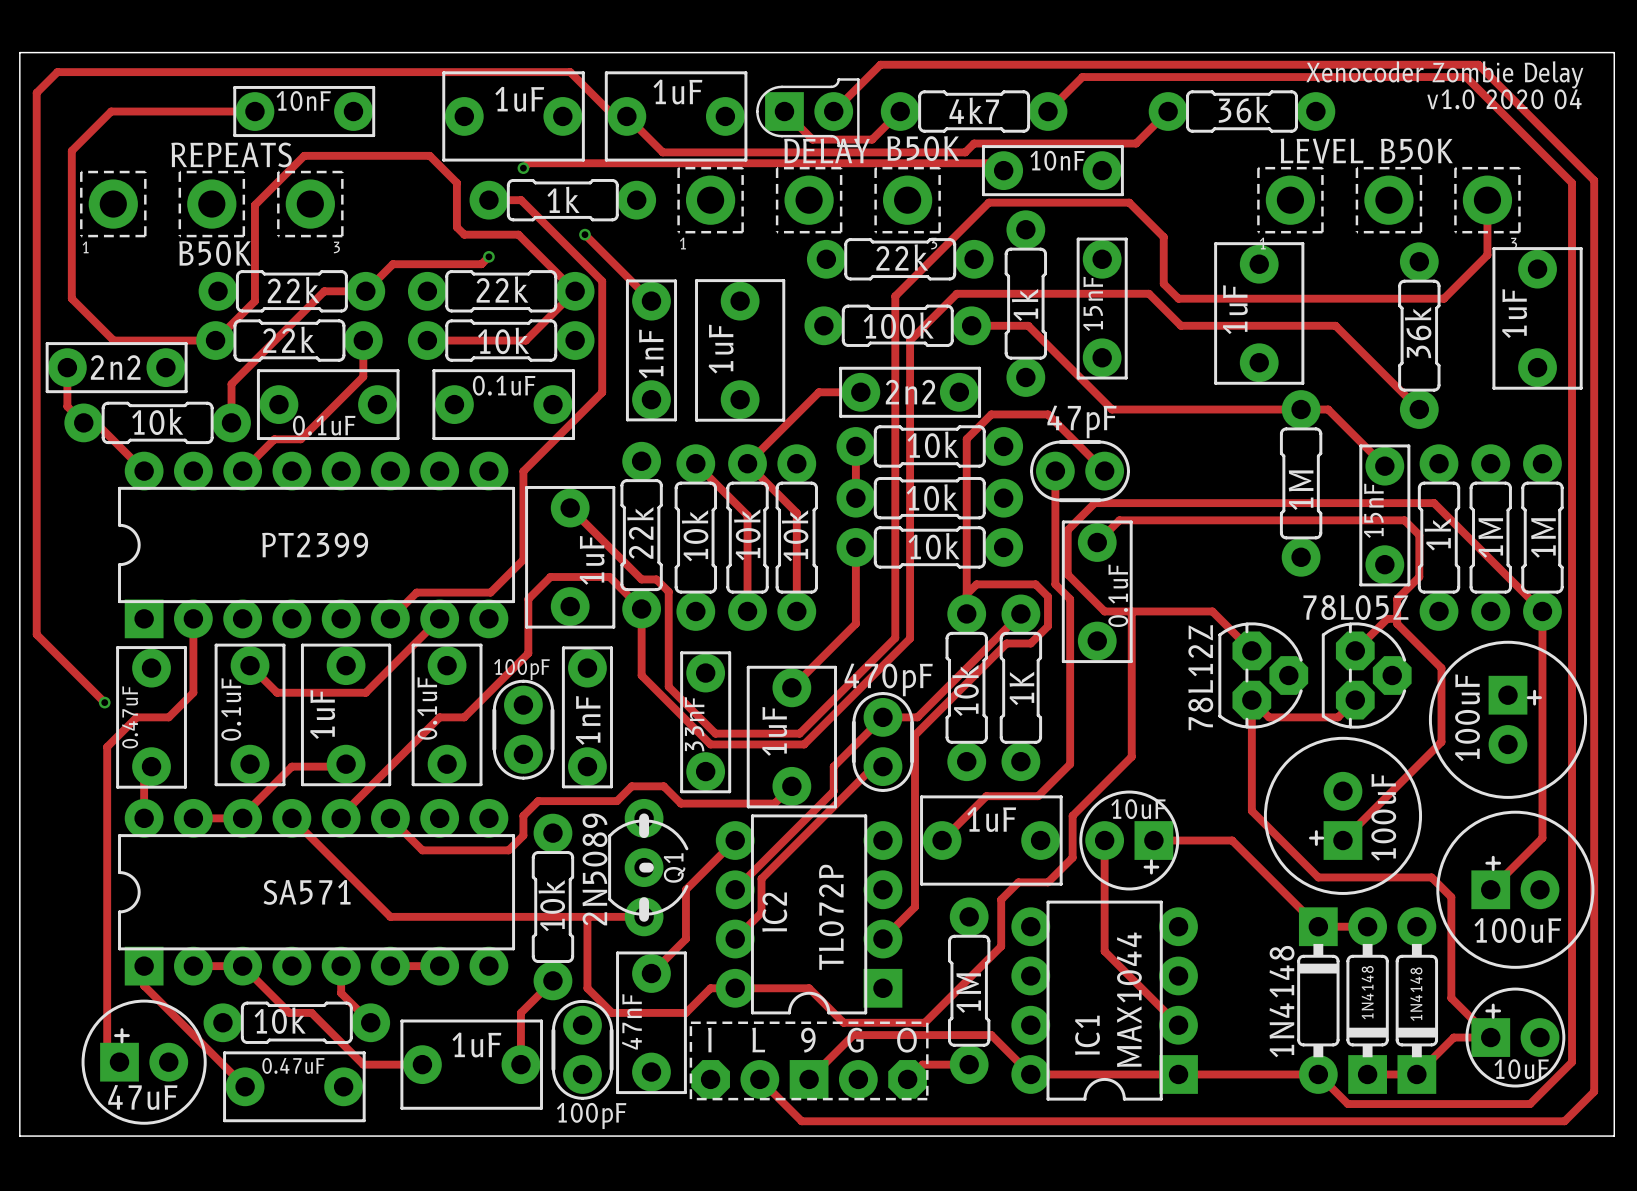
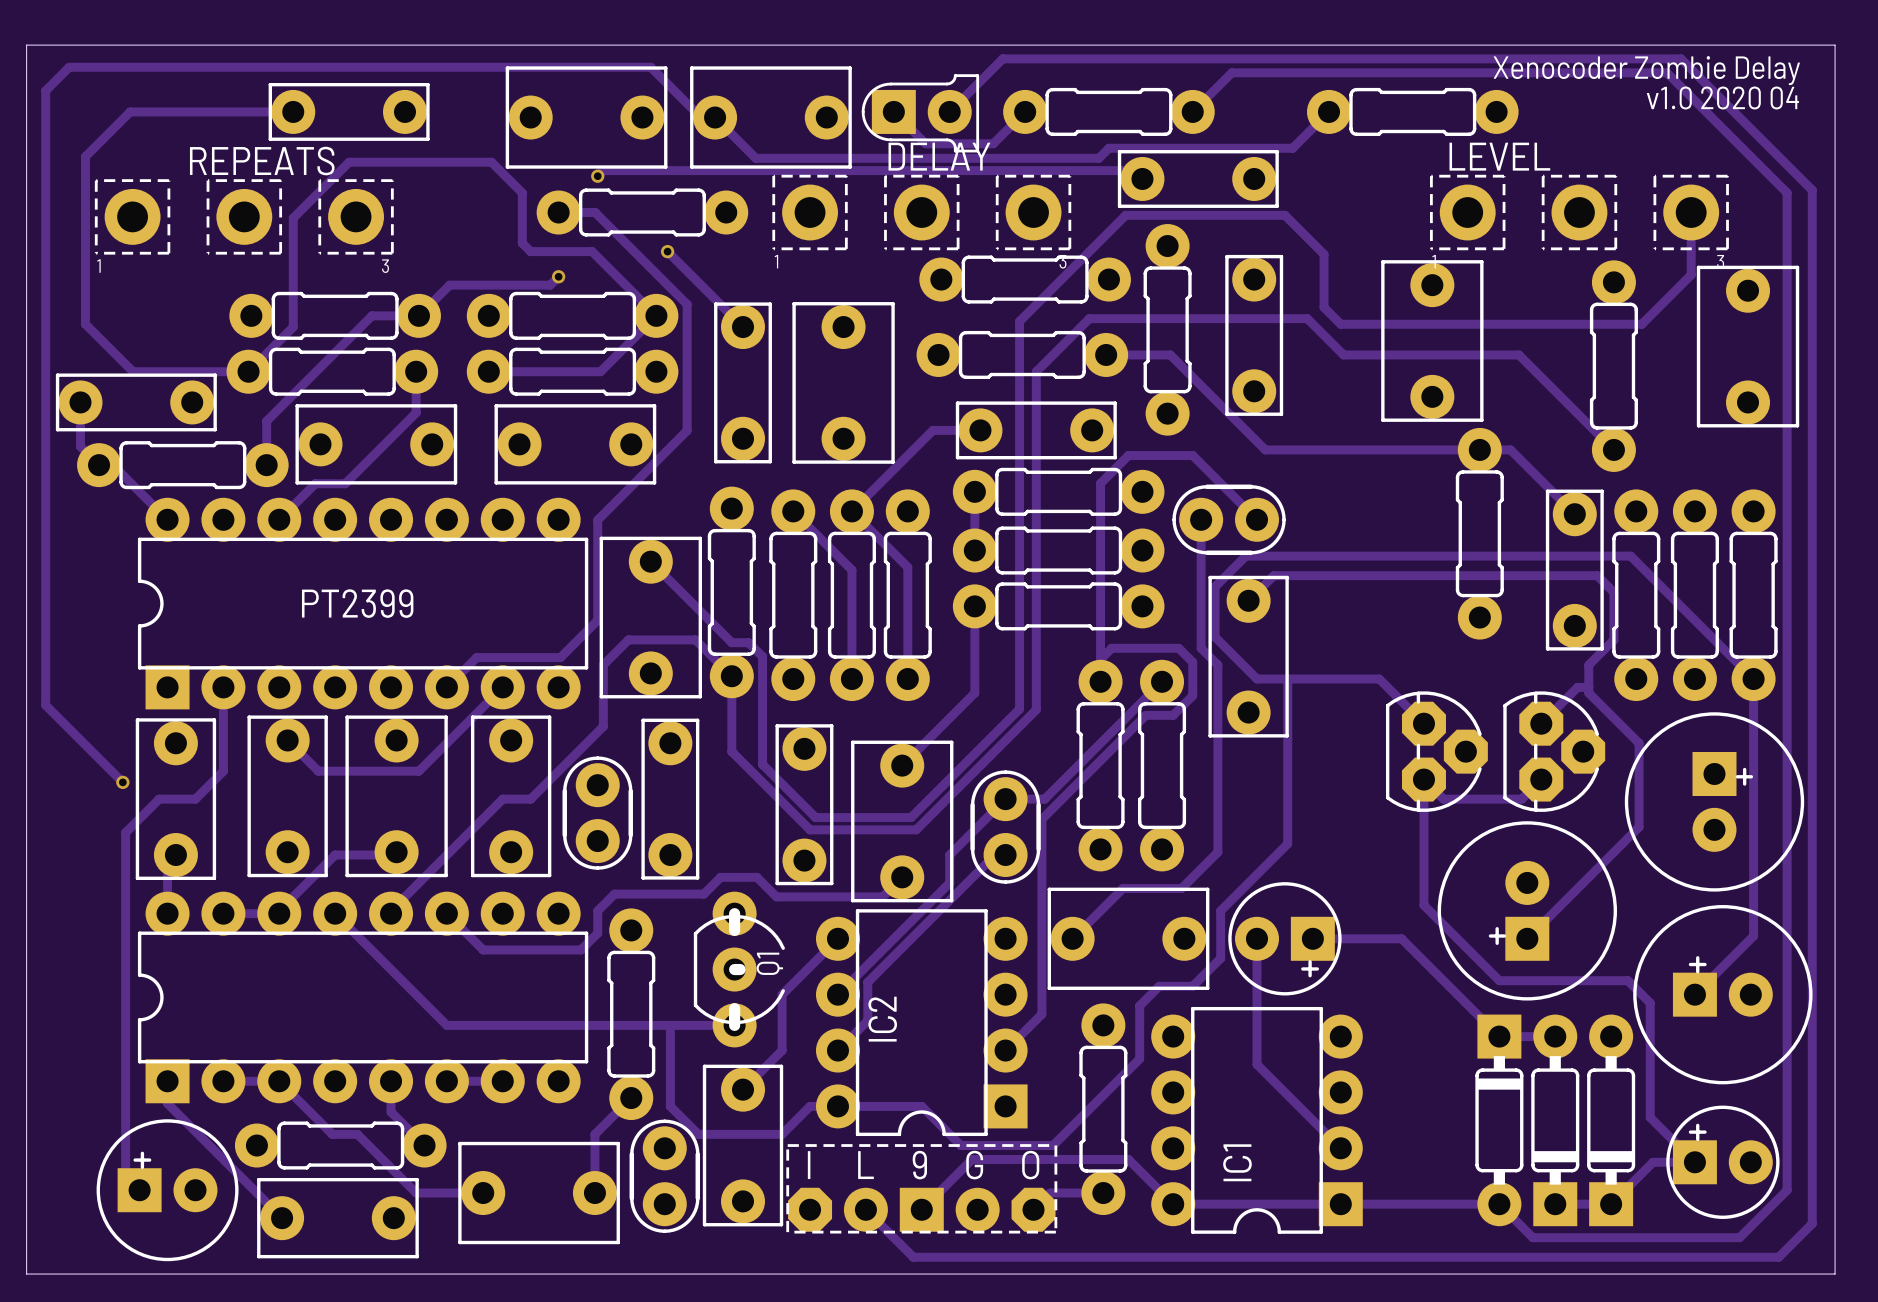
part value: 1uF (677, 92) -> none
part value: 1uF (519, 99) -> none
part value: 10nF (303, 100) -> none
part value: 36k (1244, 109) -> none
part value: 4k7 (974, 110) -> none
DELAY value: B50K (923, 148) -> none
LEVEL value: B50K (1416, 151) -> none
part value: 10nF (1057, 160) -> none
part value: 1k (563, 199) -> none
REPEATS value: B50K (215, 253) -> none
part value: 22k (902, 257) -> none
part value: 22k (502, 289) -> none
part value: 22k (293, 290) -> none
part value: 15nF (1093, 303) -> none
part value: 1k (1025, 304) -> none
part value: 1uF (1235, 309) -> none
part value: 1uF (1514, 313) -> none
part value: 100k (898, 325) -> none
part value: 36k (1418, 332) -> none
part value: 22k (288, 339) -> none
part value: 10k (503, 340) -> none
part value: 1uF (721, 349) -> none
part value: 1nF (651, 354) -> none
part value: 2n2 (115, 367) -> none
part value: 0.1uF (504, 385) -> none
part value: 2n2 (910, 392) -> none
part value: 10k (157, 421) -> none
part value: 47pF (1081, 421) -> none
part value: 0.1uF (324, 425) -> none
part value: 10k (933, 444) -> none
part value: 1M (1301, 490) -> none
part value: 10k (932, 497) -> none
part value: 15nF (1373, 510) -> none
part value: 22k (640, 532) -> none
part value: 10k (747, 534) -> none
part value: 1k (1437, 534) -> none
part value: 10k (695, 535) -> none
part value: 10k (795, 535) -> none
part value: 1M (1490, 537) -> none
part value: 1M (1543, 537) -> none
part value: 10k (934, 546) -> none
part value: 1uF (592, 560) -> none
part value: 0.1uF (1118, 595) -> none
part value: 78L05Z (1355, 607) -> none
part value: 100pF (522, 669) -> none
part value: 78L12Z (1200, 677) -> none
part value: 470pF (888, 679) -> none
part value: 1K (1021, 688) -> none
part value: 10k (965, 690) -> none
part value: 0.1uF (427, 708) -> none
part value: 0.1uF (231, 709) -> none
part value: 1uF (322, 714) -> none
part value: 0.47uF (130, 717) -> none
part value: 100uF (1467, 717) -> none
part value: 1nF (588, 720) -> none
part value: 33nF (694, 724) -> none
part value: 1uF (774, 731) -> none
part value: 10uF (1138, 809) -> none
part value: 100uF (1383, 817) -> none
part value: 1uF (991, 819) -> none
Q1 value: 2N5089 (594, 869) -> none
part value: SA571 (307, 892) -> none
part value: 10k (551, 905) -> none
IC2 value: TL072P (831, 917) -> none
part value: 100uF (1517, 930) -> none
part value: 1N4148 (1367, 992) -> none
part value: 1M (968, 993) -> none
part value: 1N4148 (1416, 994) -> none
IC1 value: MAX1044 (1129, 999) -> none
part value: 1N4148 (1282, 1001) -> none
part value: 10k (280, 1020) -> none
part value: 47nF (631, 1021) -> none
part value: 1uF (476, 1044) -> none
part value: 0.47uF (293, 1065) -> none
part value: 10uF (1521, 1069) -> none
part value: 47uF (142, 1097) -> none
part value: 100pF (591, 1115) -> none

